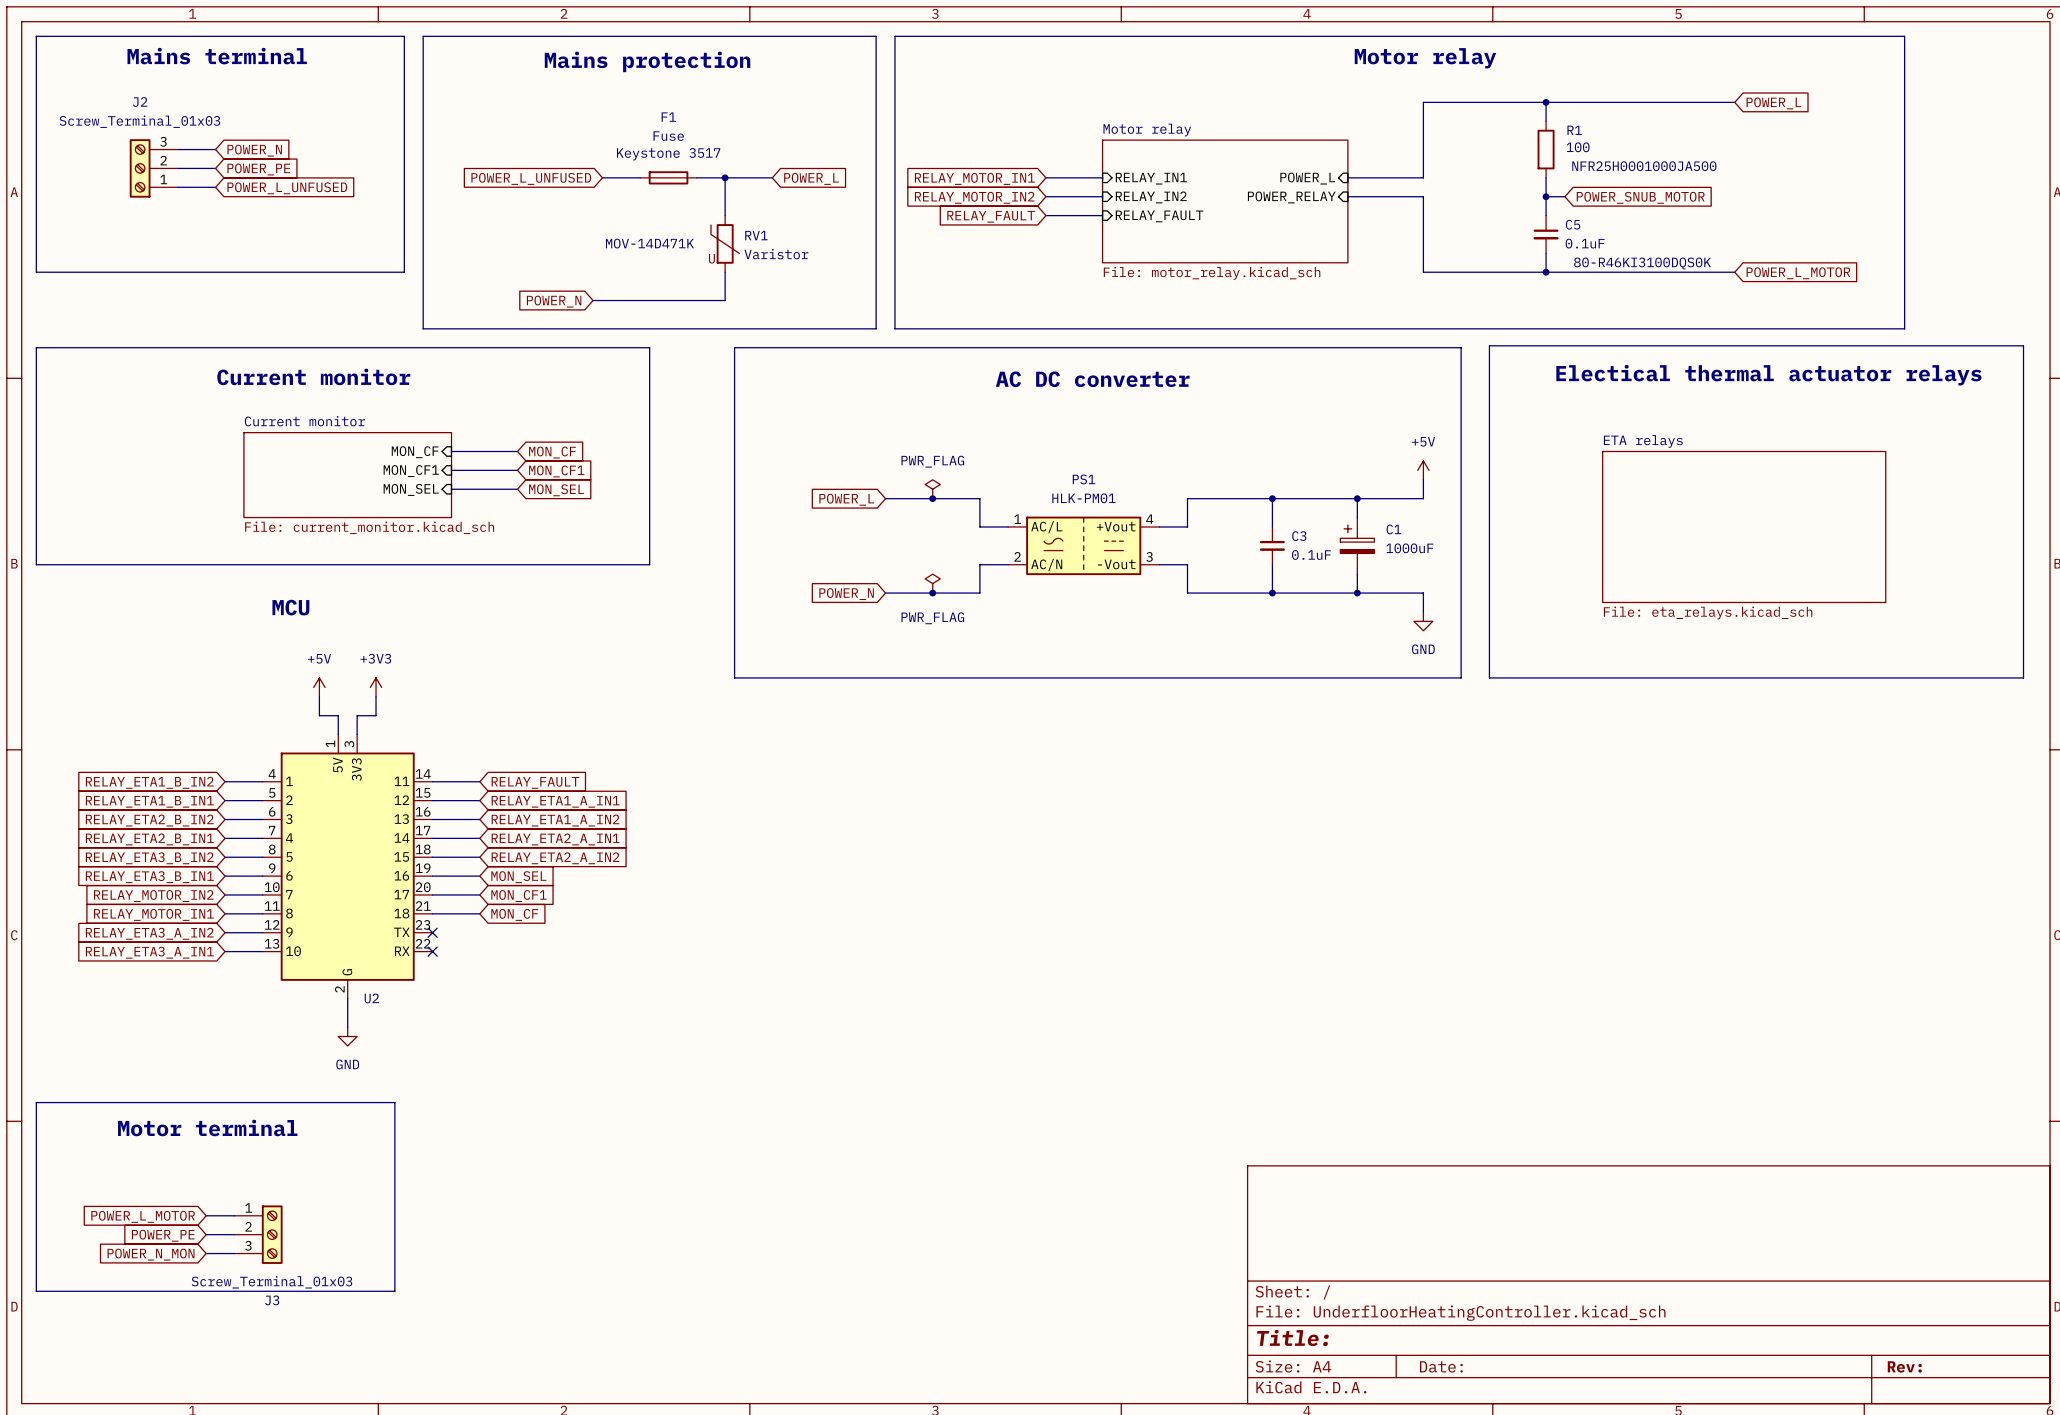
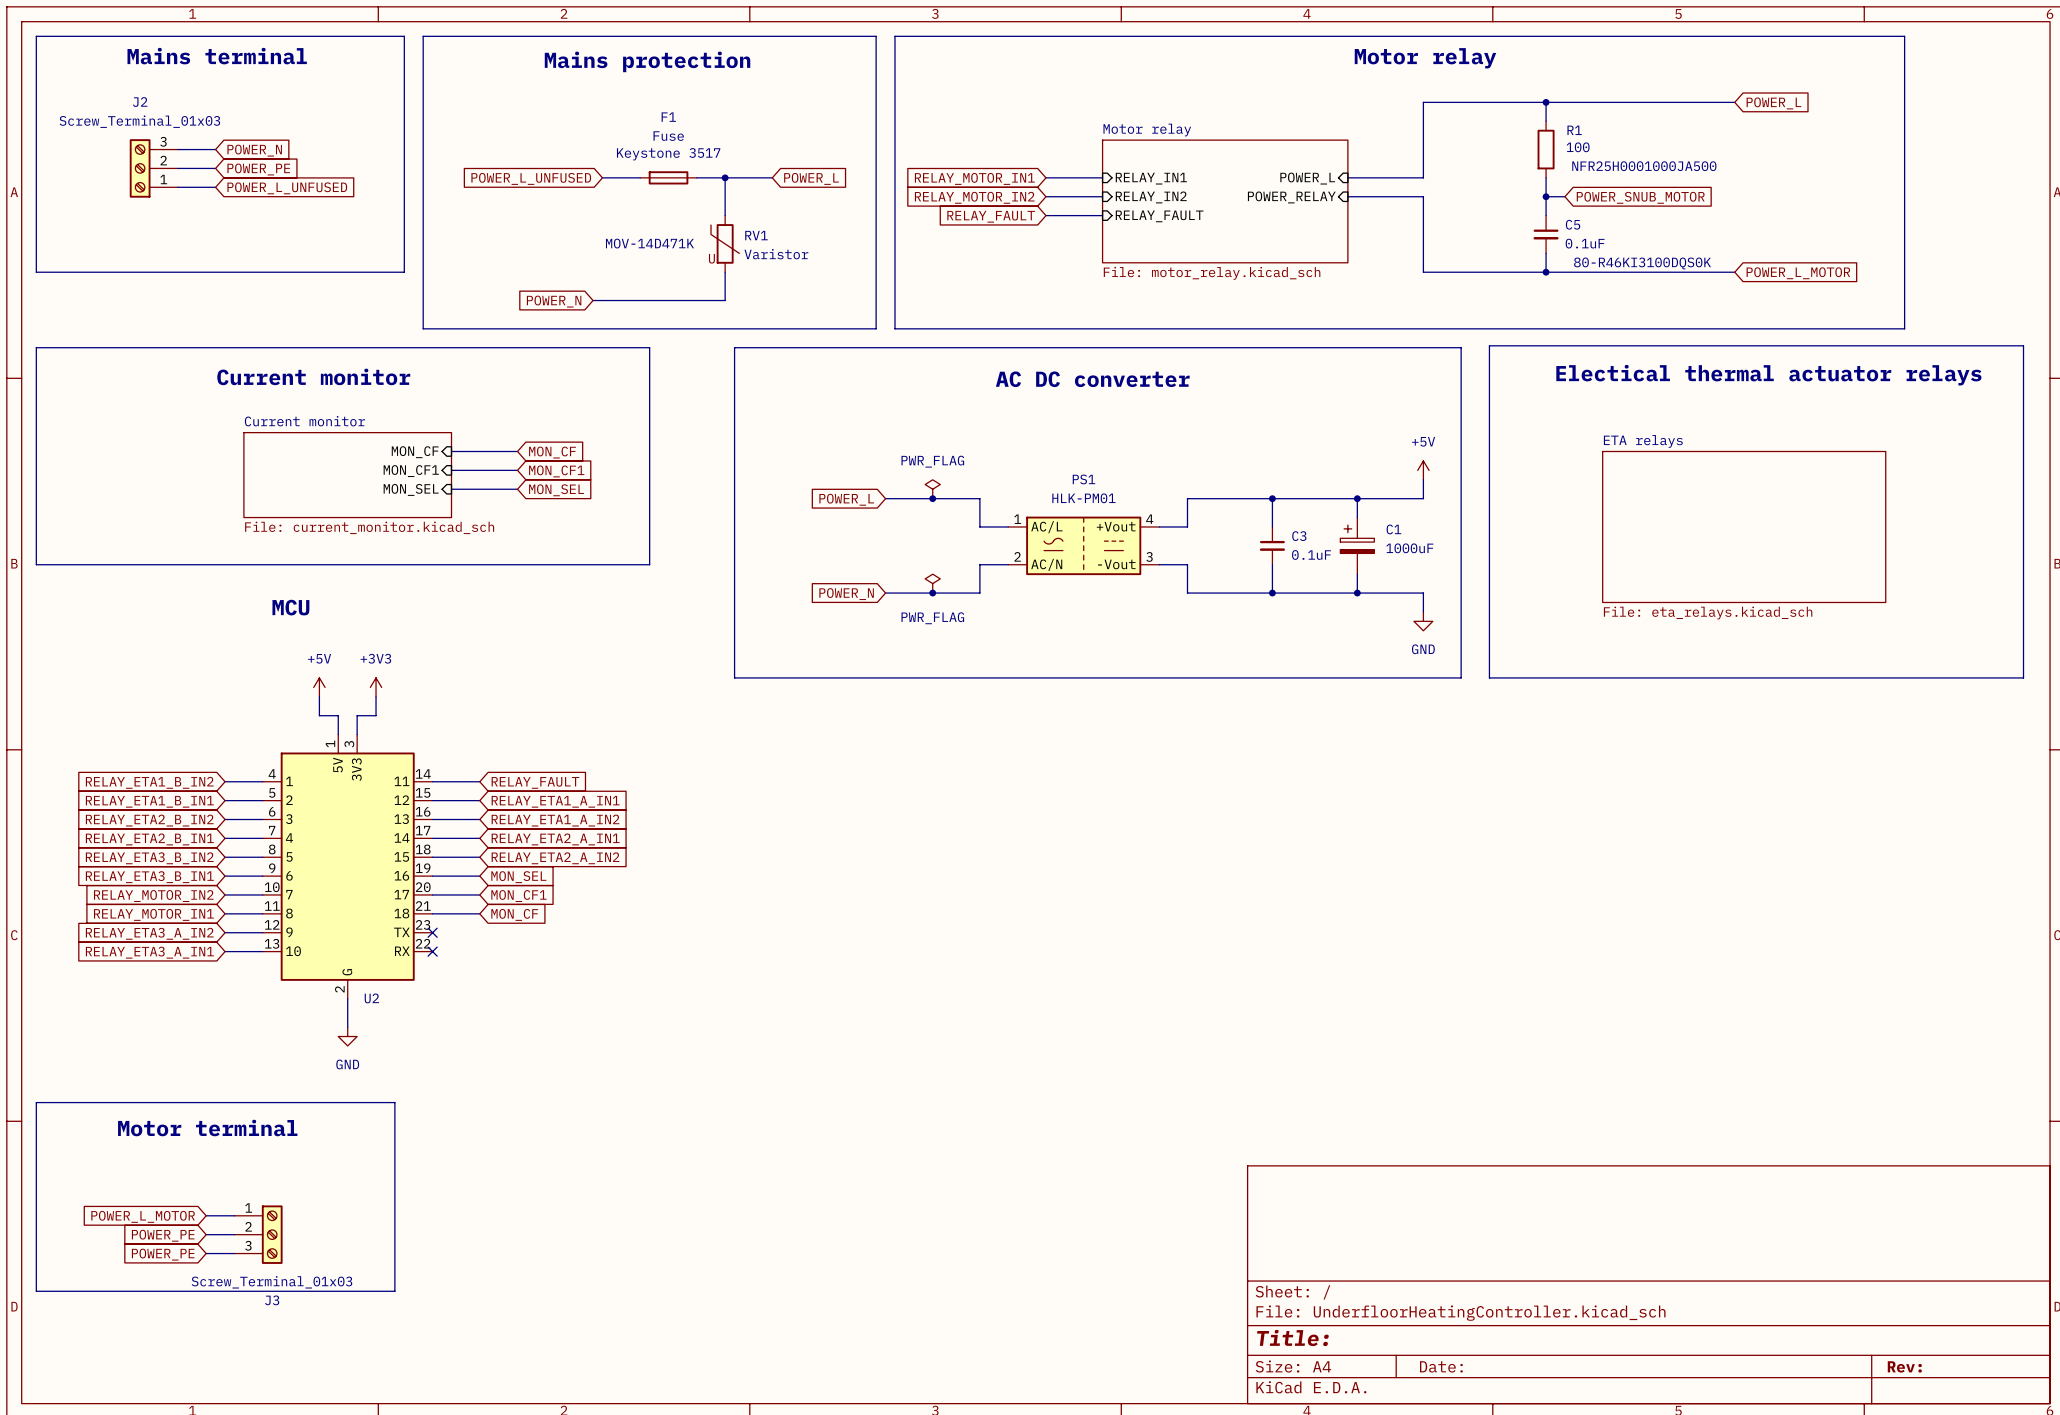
global label: POWER_N_MON (151, 1254) -> POWER_PE (163, 1254)

